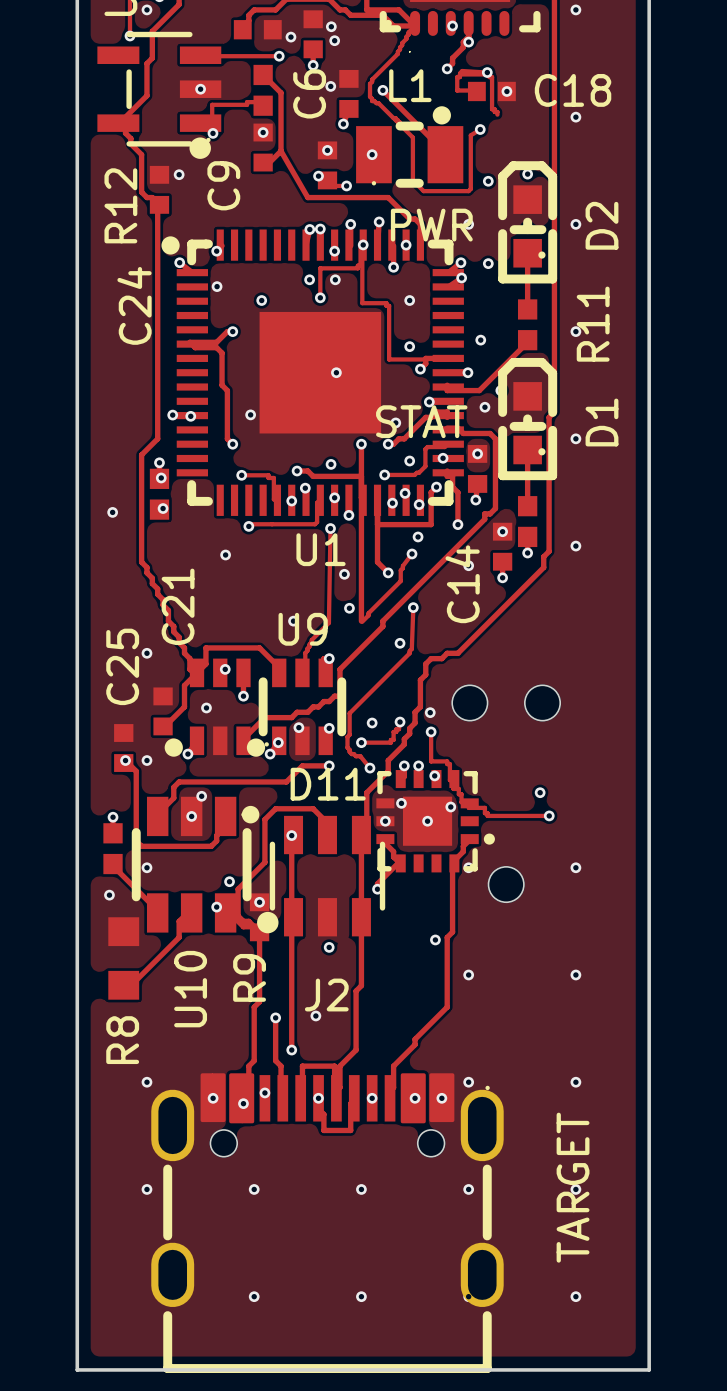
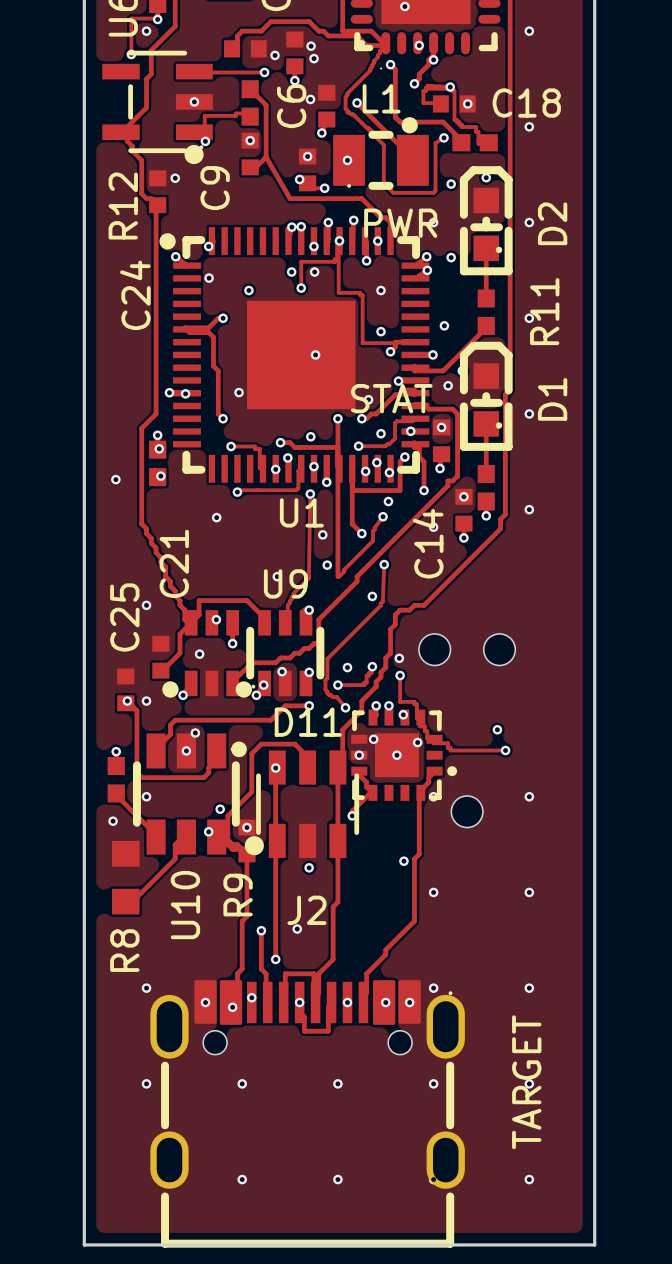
track: none -> (390, 64) (395, 69) (395, 117) (400, 122) (443, 122) (462, 141)
via: none -> (390, 64)
track: none -> (459, 124) (461, 124) (461, 127) (476, 127) (476, 131) (478, 131) (478, 143) (488, 143)
part: none -> (475, 142)

